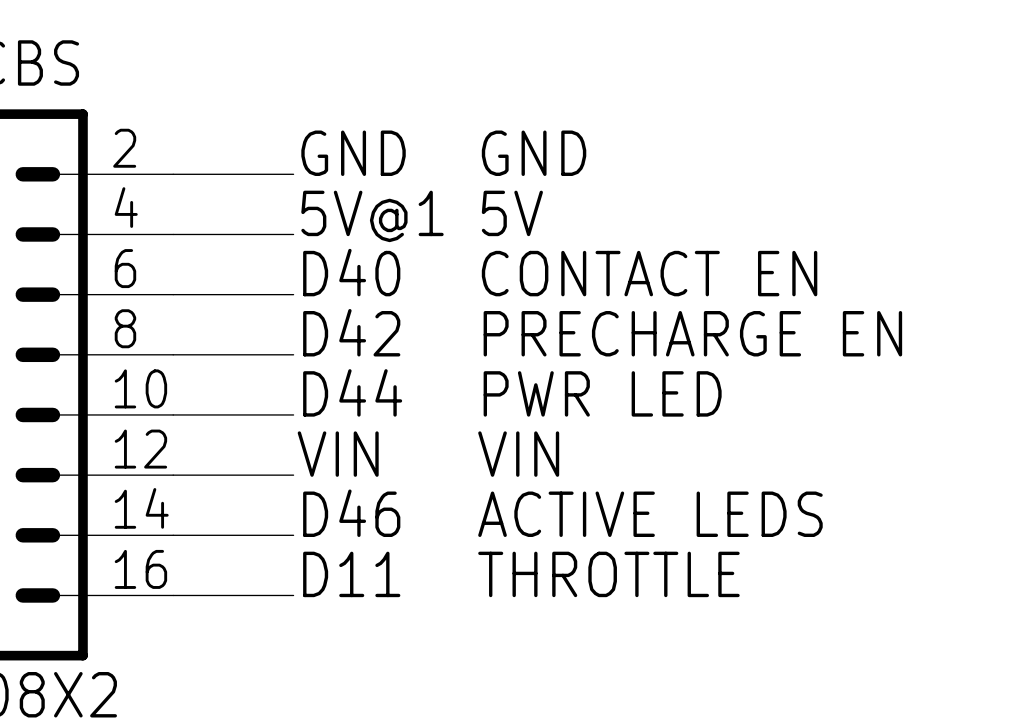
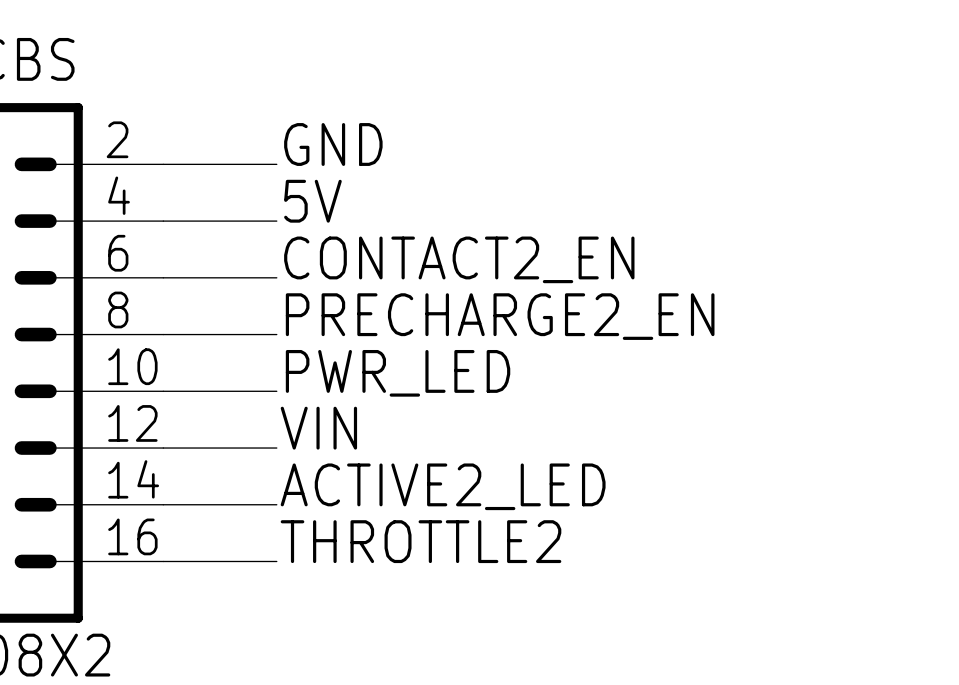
text: GND (534, 153) -> none
text: 5V (512, 213) -> none
label: 5V@1 (372, 216) -> 5V (312, 201)
label: D40 (351, 272) -> CONTACT2_EN (459, 259)
text: CONTACT EN (649, 273) -> none
label: D42 (351, 332) -> PRECHARGE2_EN (500, 316)
text: PRECHARGE EN (692, 333) -> none
label: D44 (352, 392) -> PWR_LED (398, 373)
text: PWR LED (602, 393) -> none
text: VIN (518, 454) -> none
label: D46 (351, 513) -> ACTIVE2_LED (443, 486)
text: ACTIVE LEDS (650, 514) -> none
label: D11 (351, 574) -> THROTTLE2 (421, 541)
text: THROTTLE (608, 574) -> none

